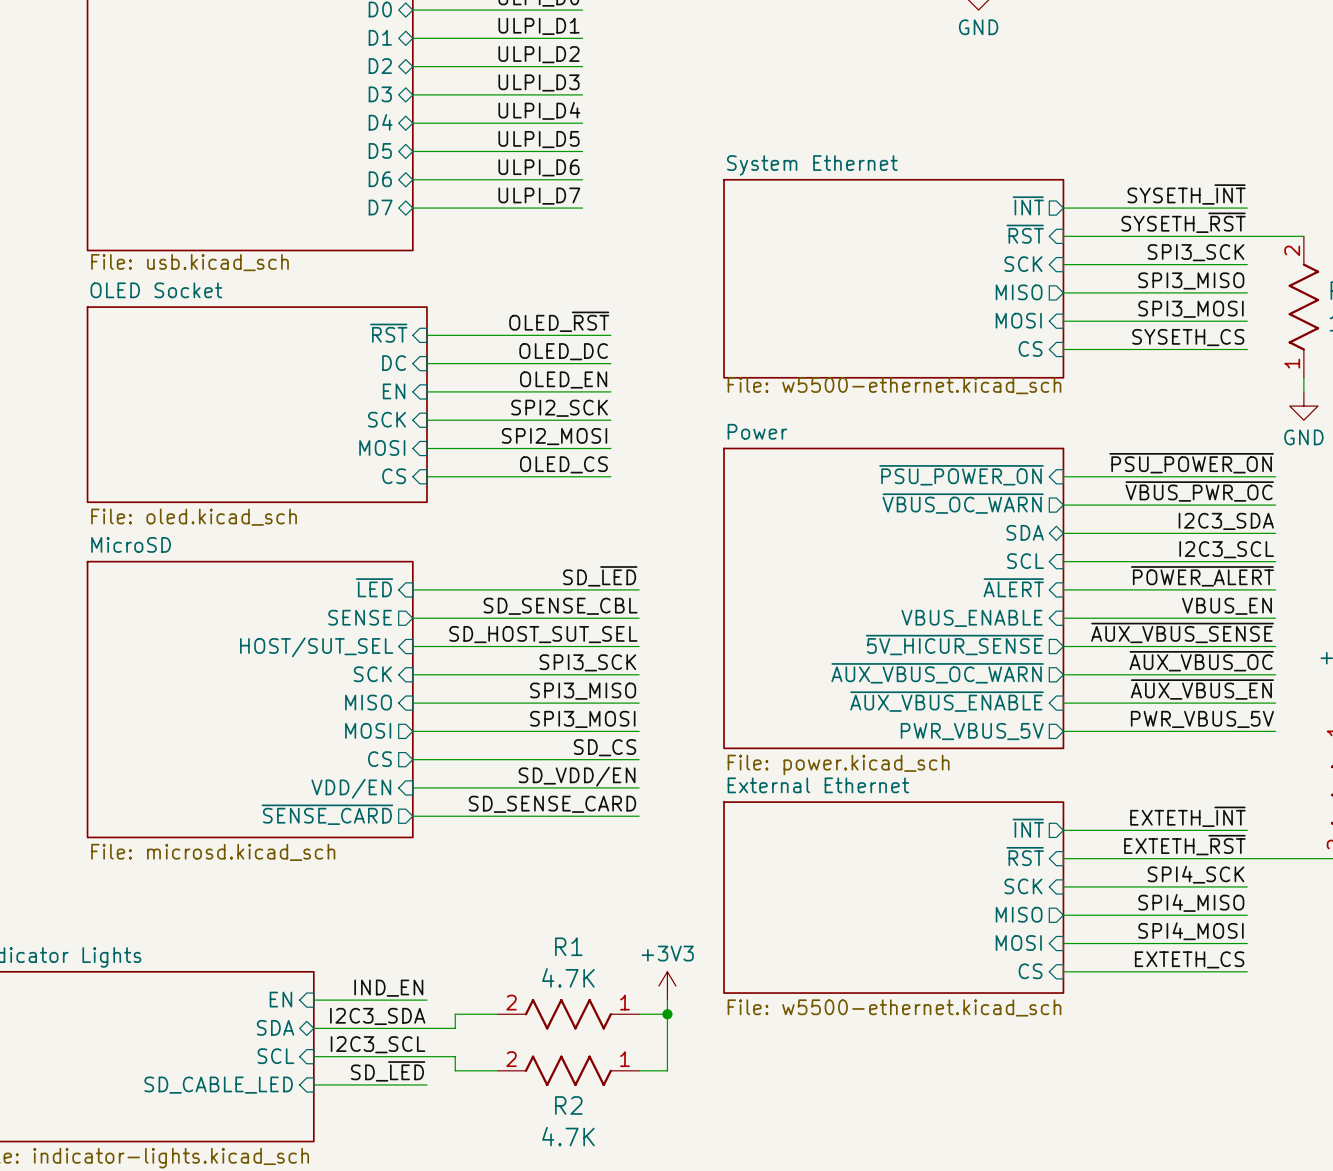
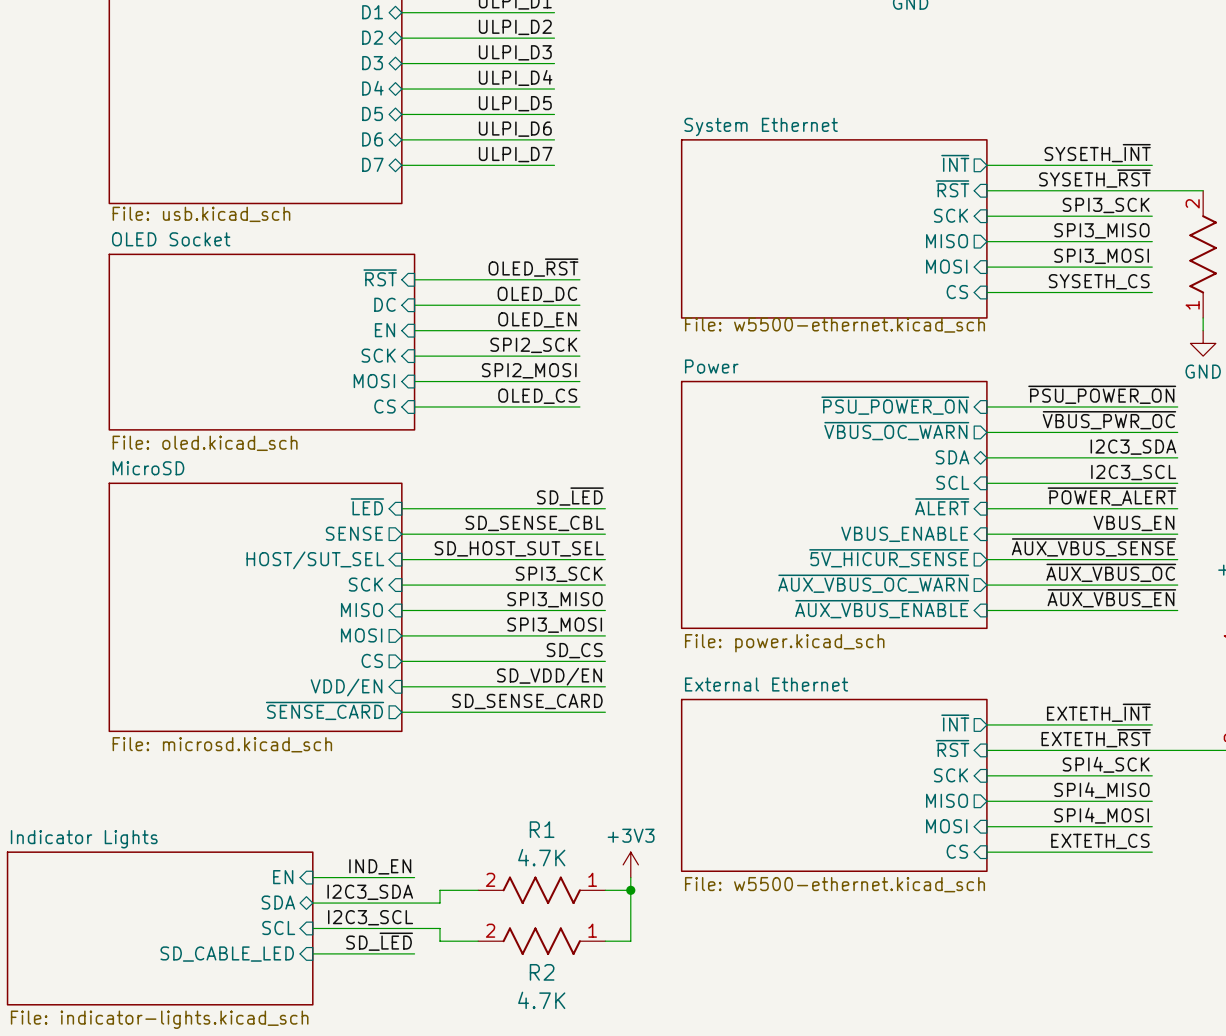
sheet Power: none -> File: power.kicad_sch (834, 504)
sheet Power: File: power.kicad_sch (893, 598) -> none
label: PWR_VBUS_5V (1202, 719) -> none
sheet pin: PWR_VBUS_5V (972, 731) -> none
wire: (1063, 731) (1275, 731) -> none

